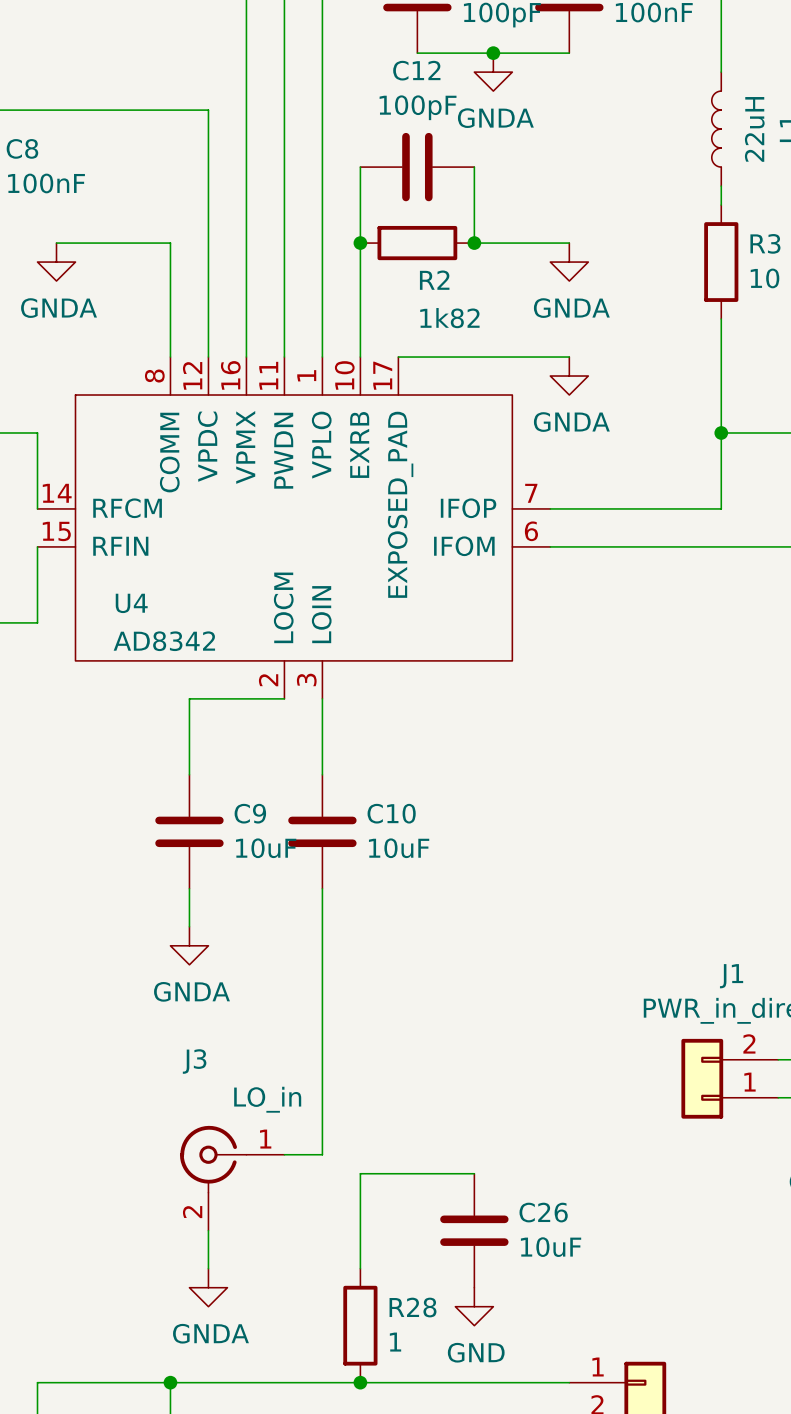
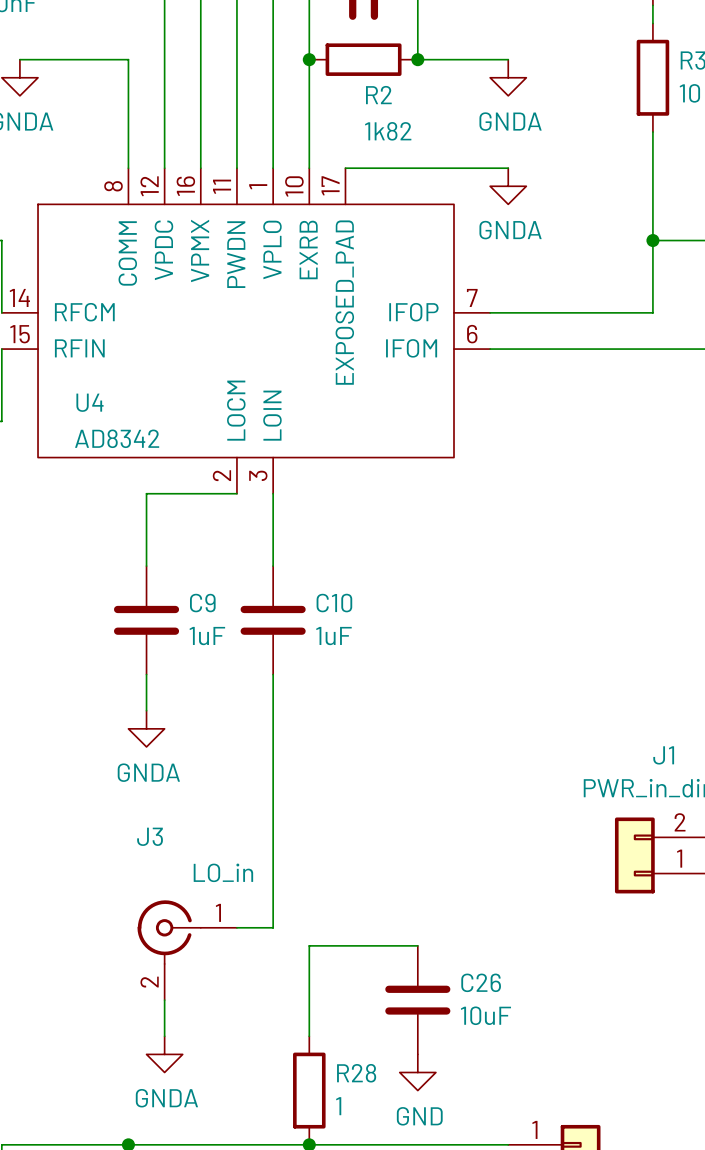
C9 value: 10uF (266, 848) -> 1uF (207, 636)
C10 value: 10uF (399, 848) -> 1uF (333, 636)

